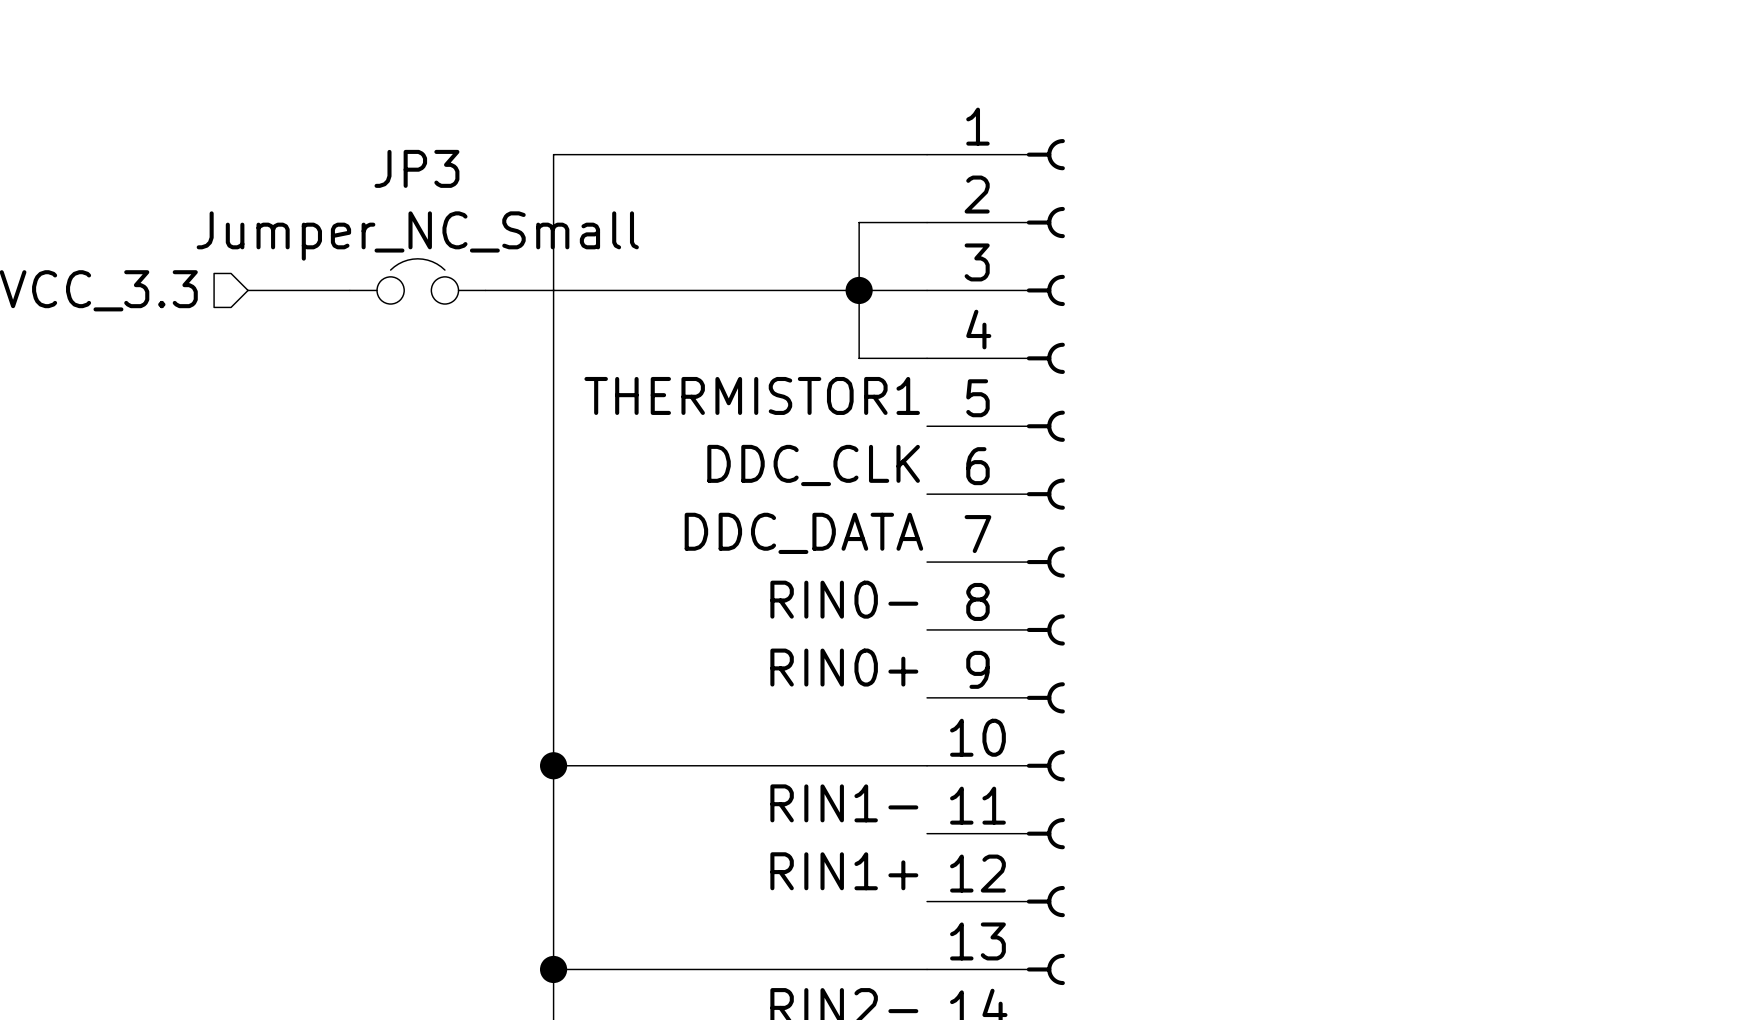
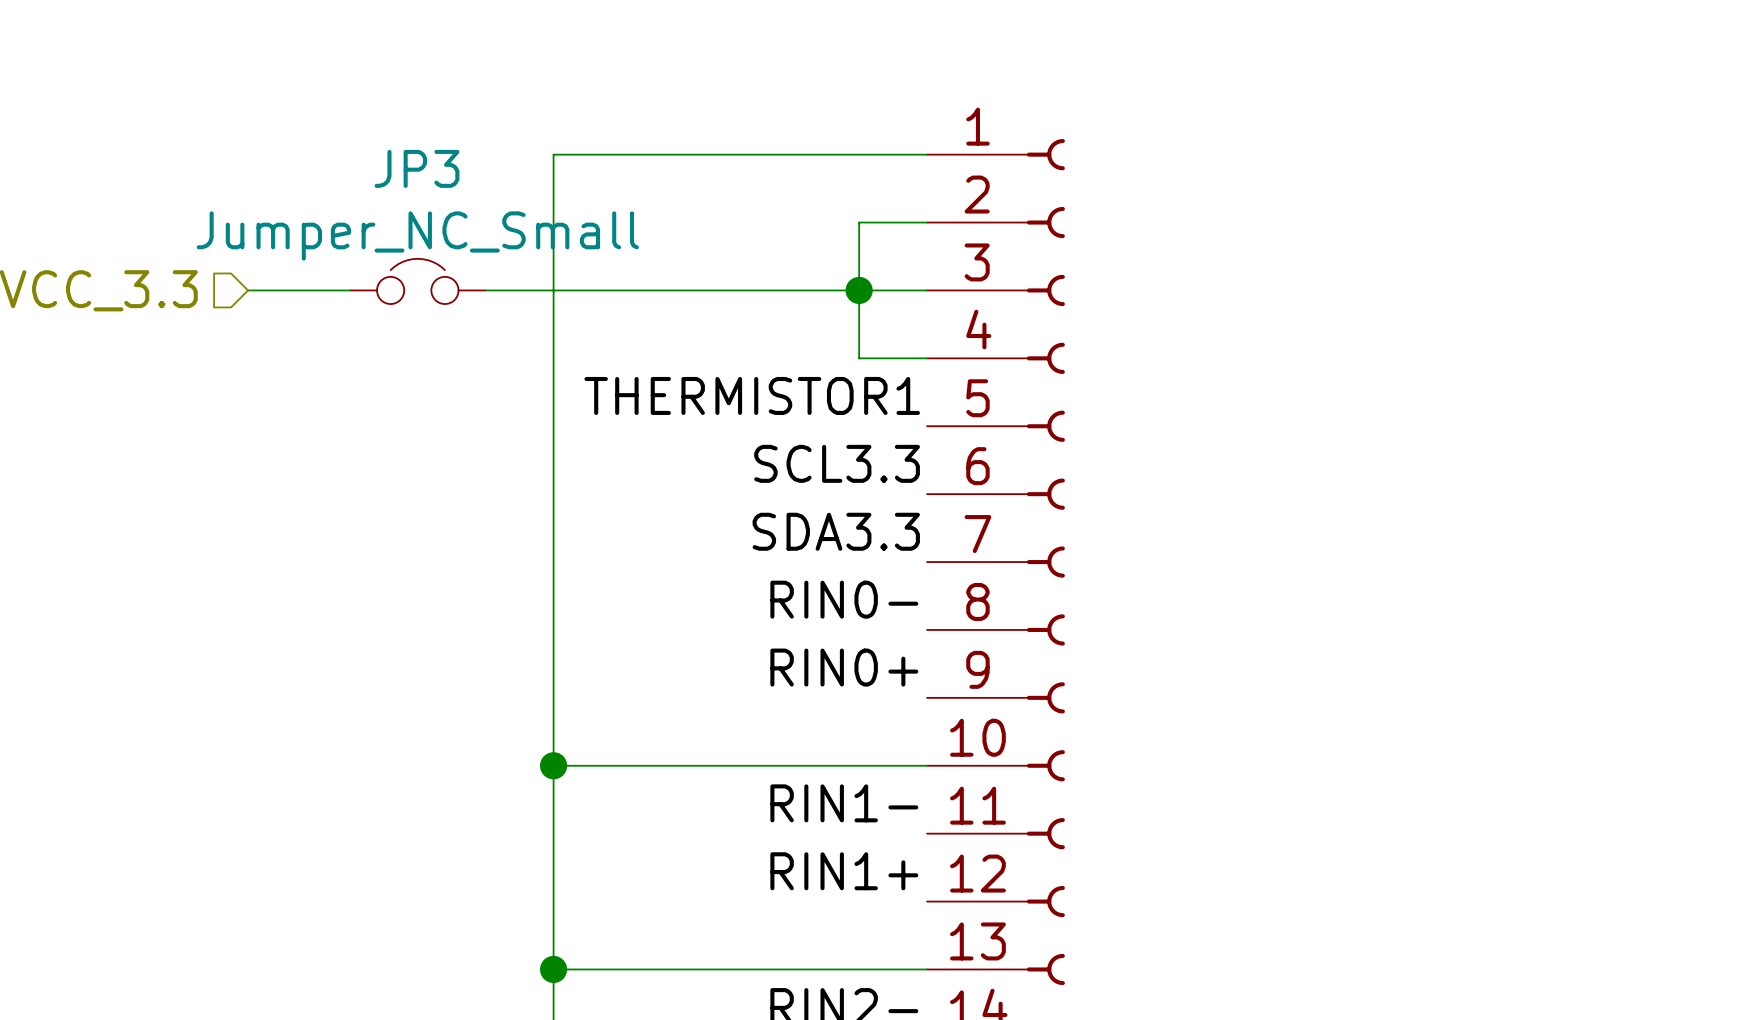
label: DDC_CLK (813, 465) -> SCL3.3 (837, 463)
label: DDC_DATA (803, 533) -> SDA3.3 (836, 531)

